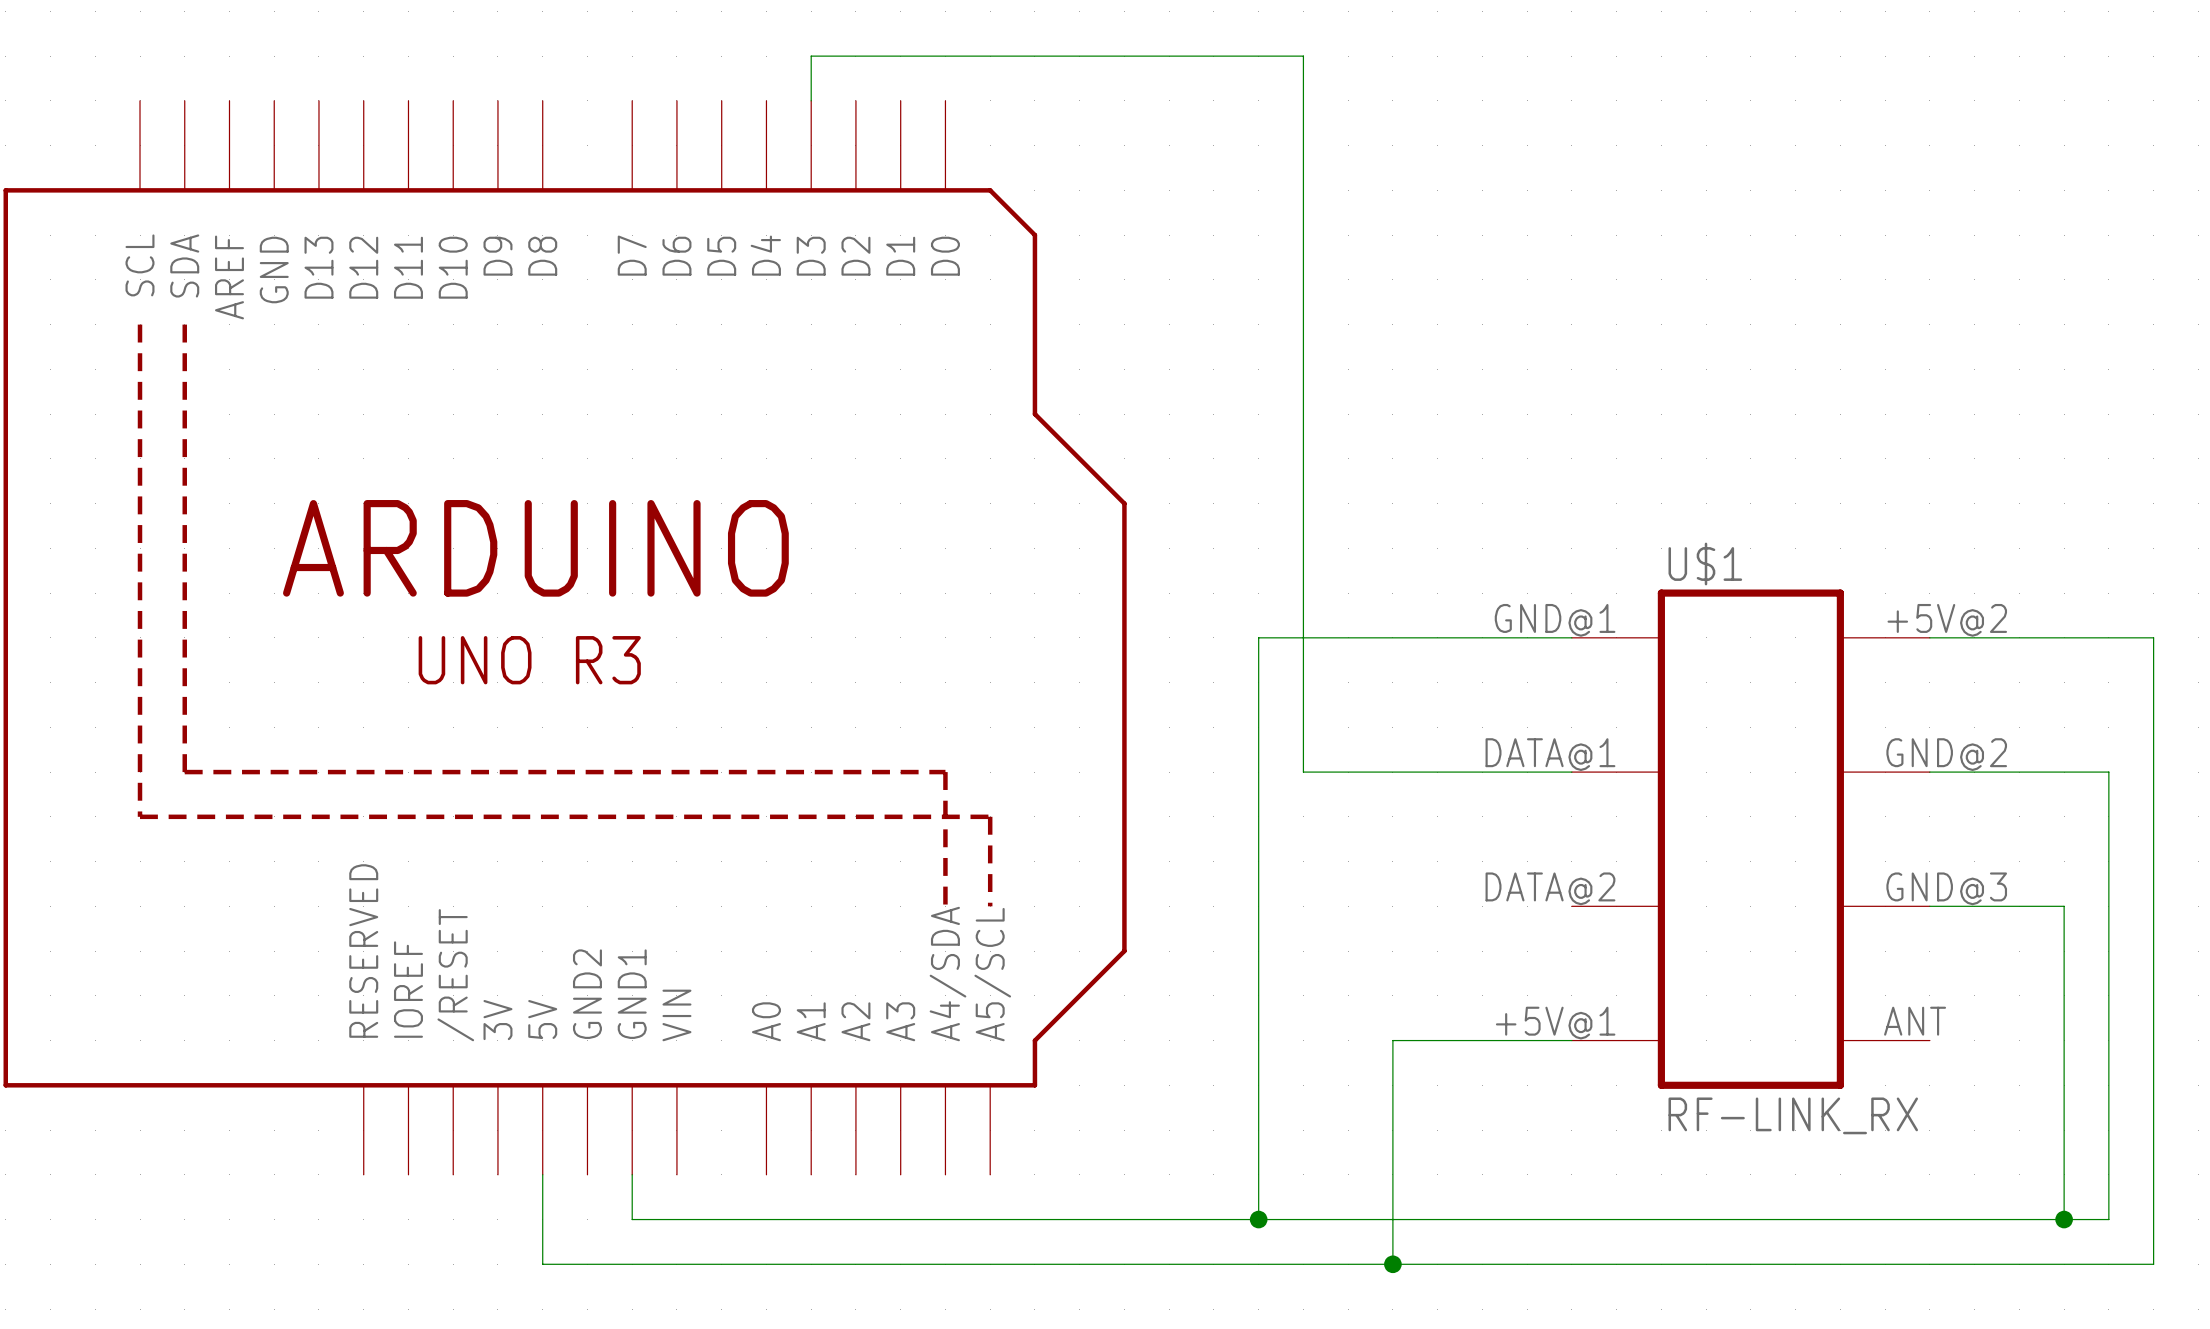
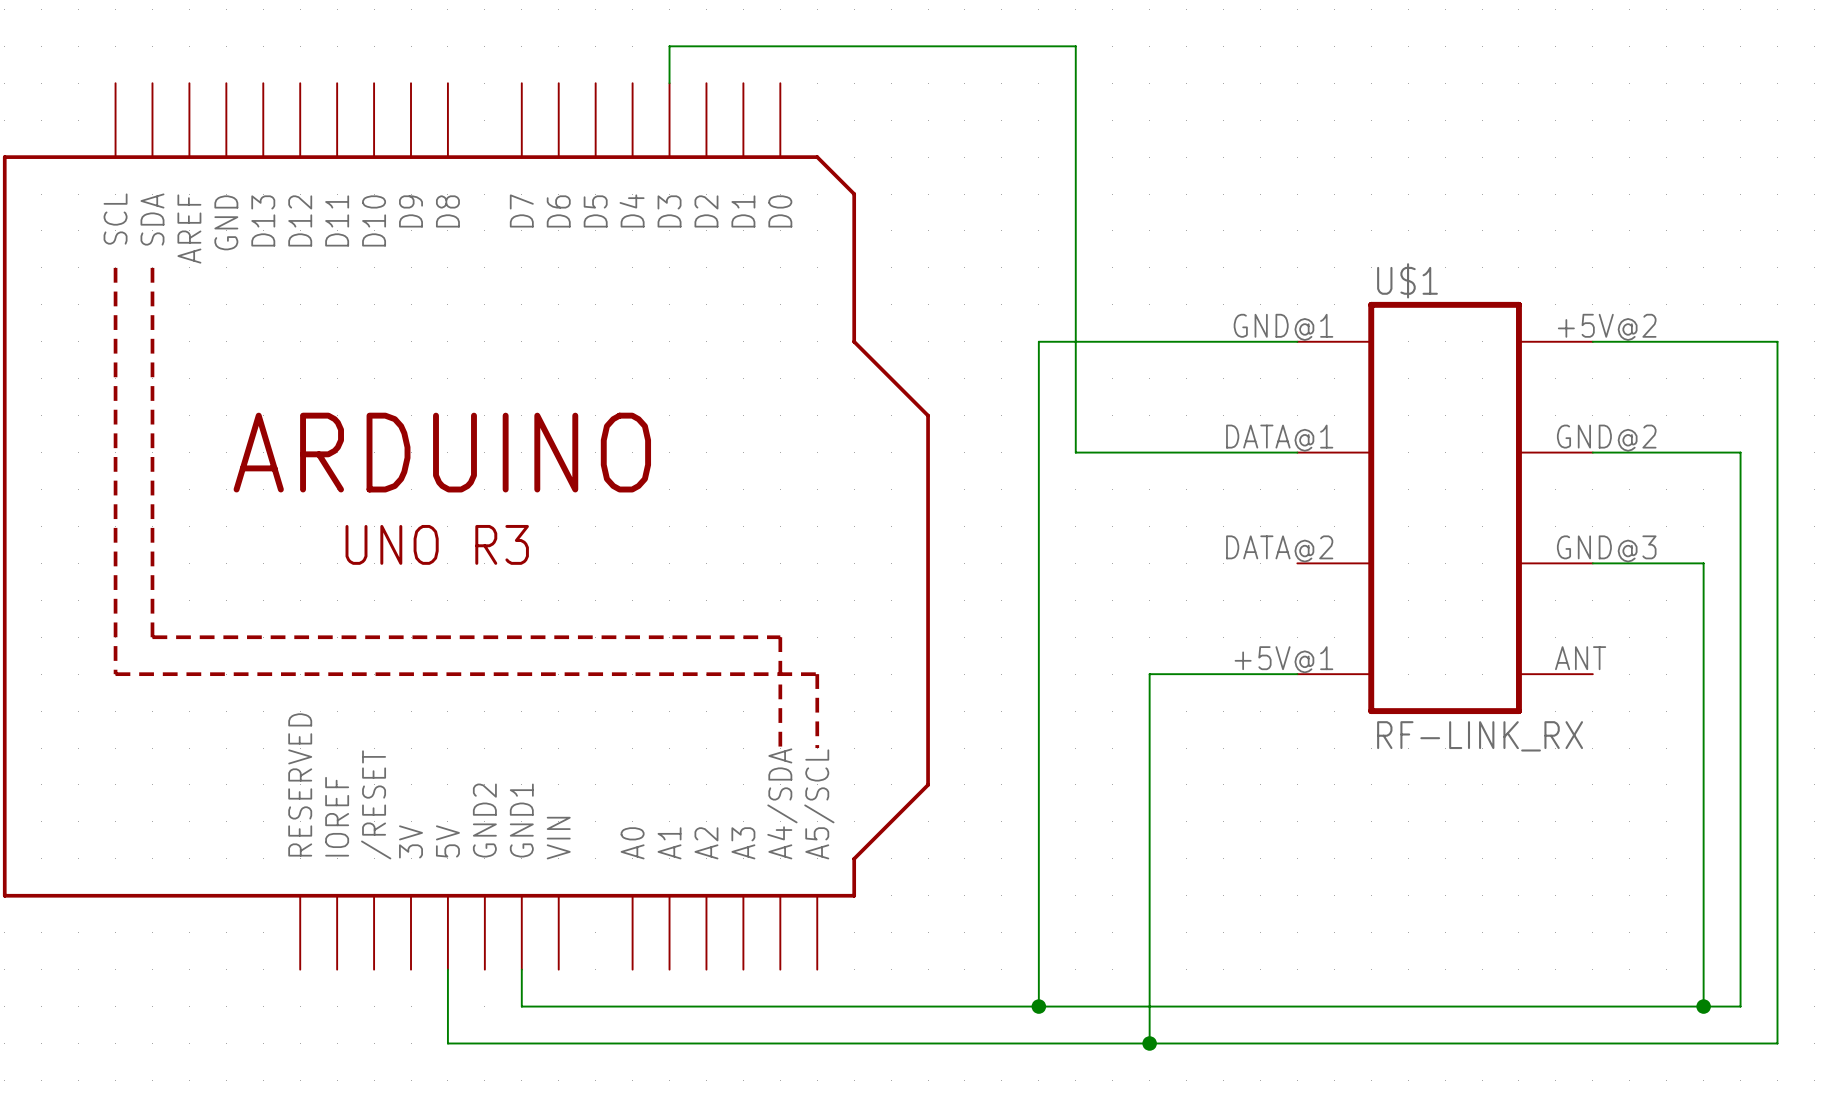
wire: (1303, 548) (1303, 772) (1571, 772) -> (1075, 452) (1297, 452)
wire: (1258, 637) (1571, 637) -> (1038, 526) (1038, 341) (1297, 341)
wire: (1929, 637) (2153, 637) -> (1592, 341) (1777, 341) (1777, 526)
wire: (1929, 772) (2108, 772) -> (1592, 452) (1740, 452) (1740, 637)
U$1 position: (1750, 839) -> (1445, 507)
wire: (1929, 906) (2064, 906) -> (1592, 563) (1703, 563) (1703, 748)
wire: (1392, 1040) (1571, 1040) -> (1149, 858) (1149, 674) (1297, 674)

